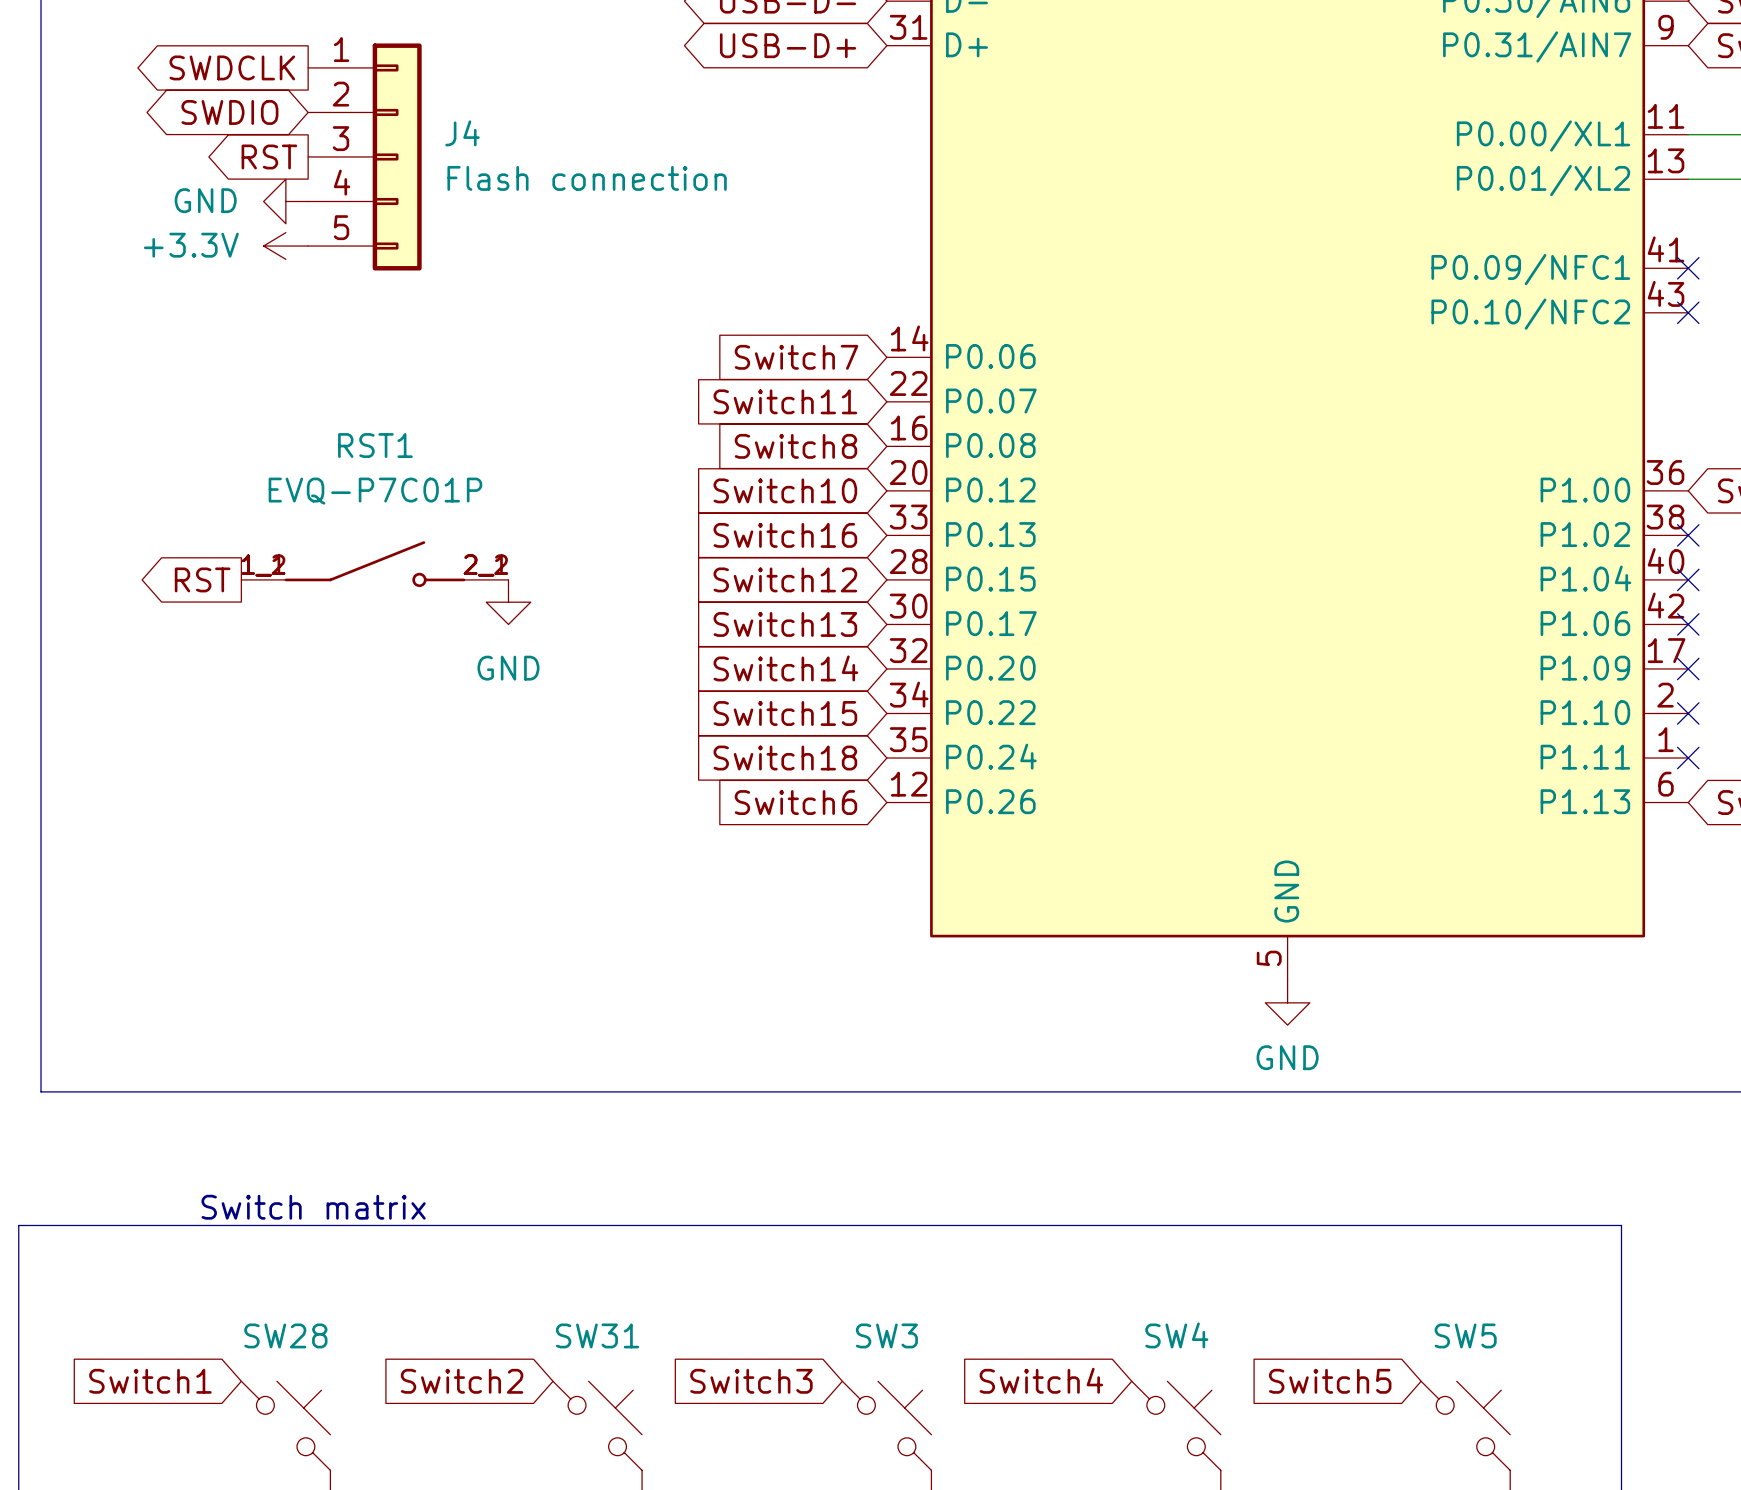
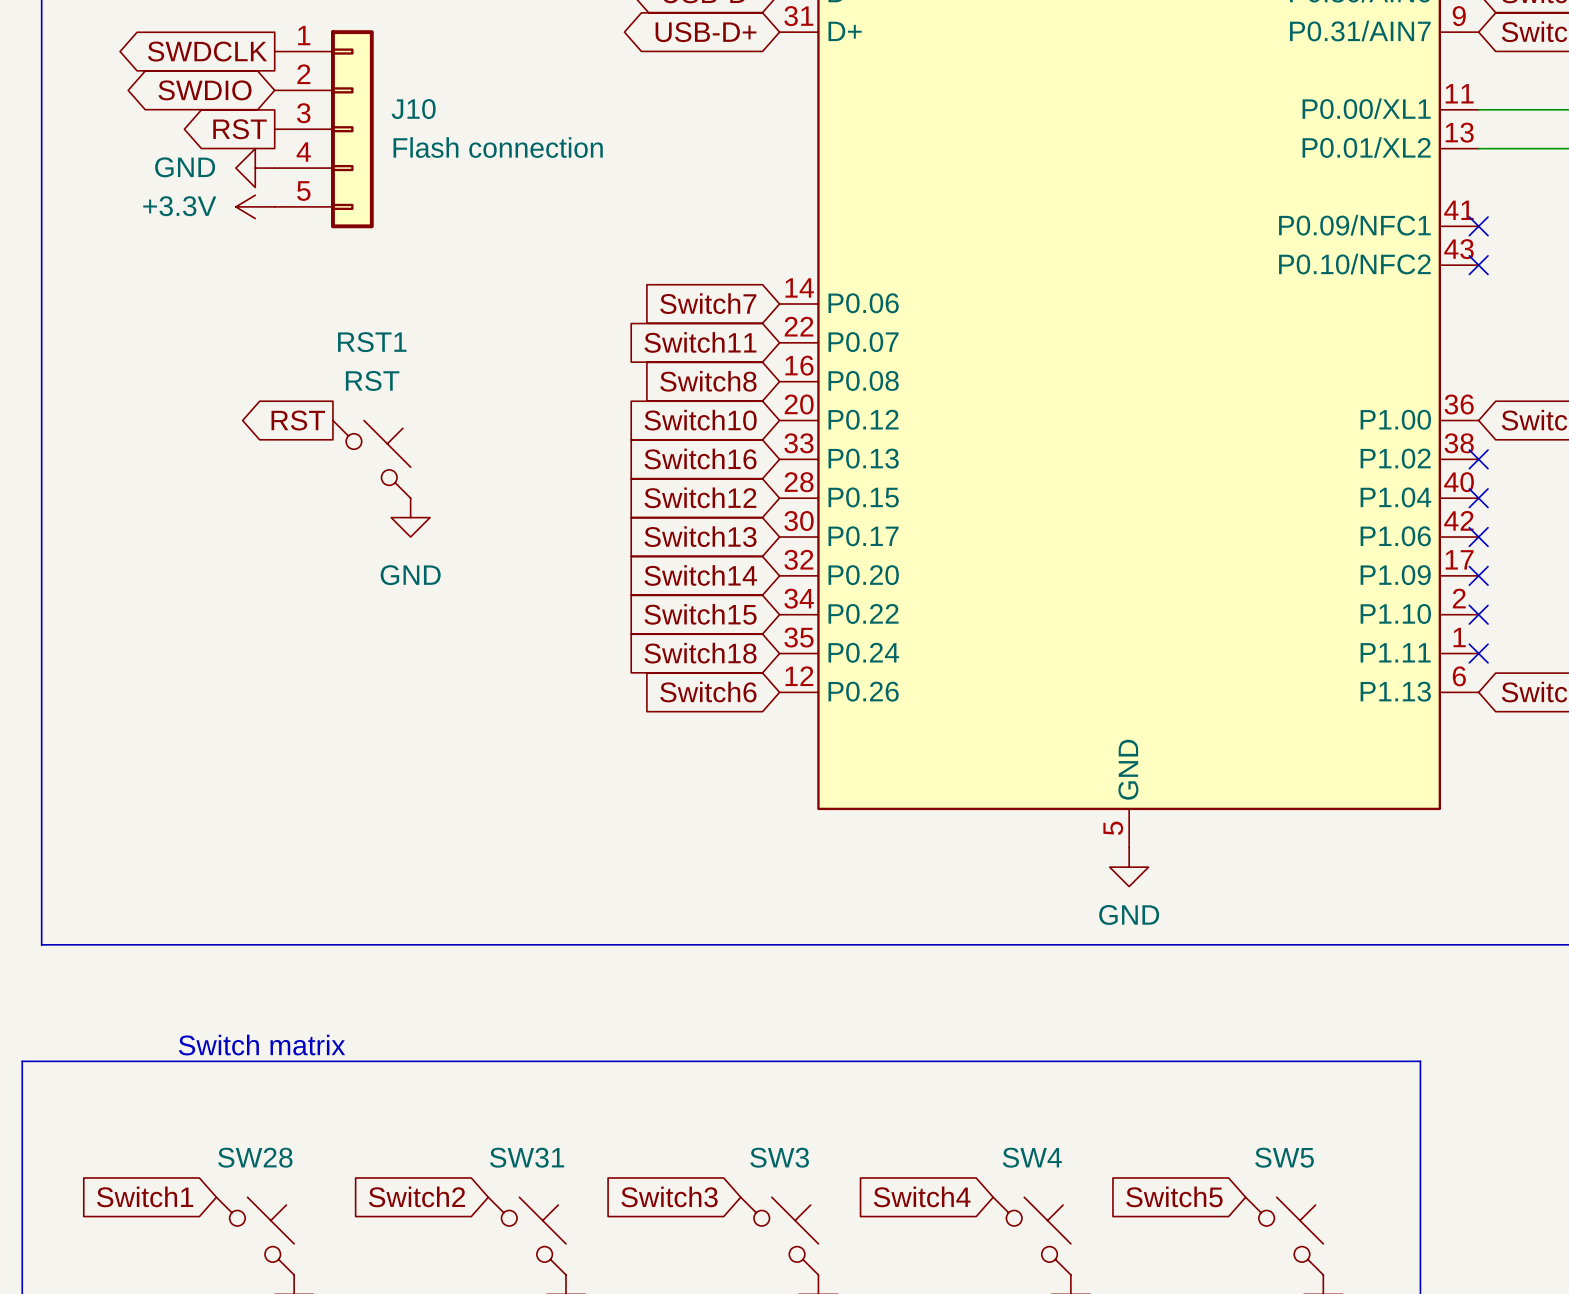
J4 name: J4 (462, 133) -> J10 (413, 109)
RST1 value: EVQ-P7C01P (375, 491) -> RST (372, 380)
RST1 symbol: [241, 541, 509, 588] -> [332, 420, 411, 499]
global label position: RST (202, 579) -> RST (298, 420)
power symbol position: GND (508, 602) -> GND (410, 517)

